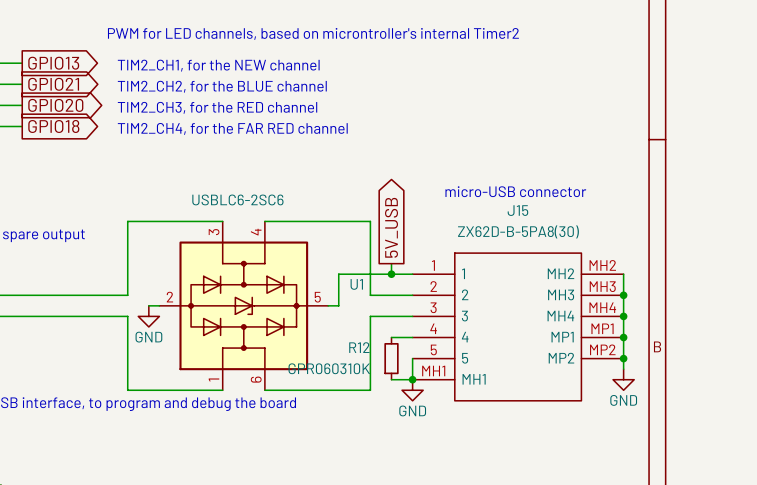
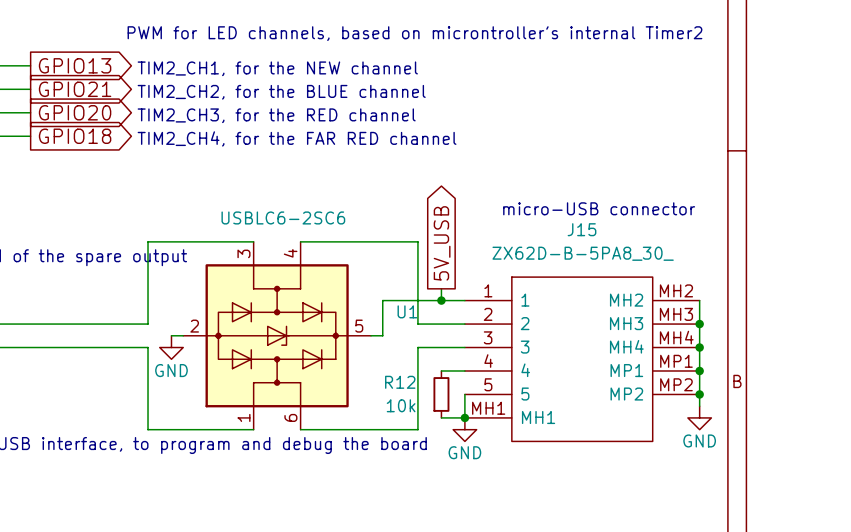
J15 value: ZX62D-B-5PA8(30) (518, 231) -> ZX62D-B-5PA8_30_ (583, 253)
R12 value: GPR060310K (329, 368) -> 10k (401, 405)

